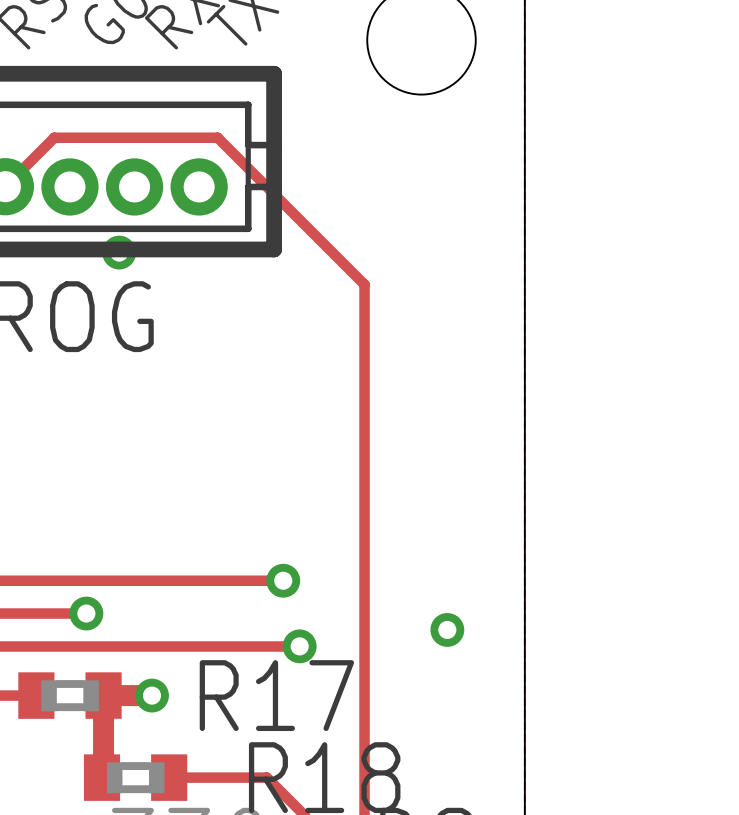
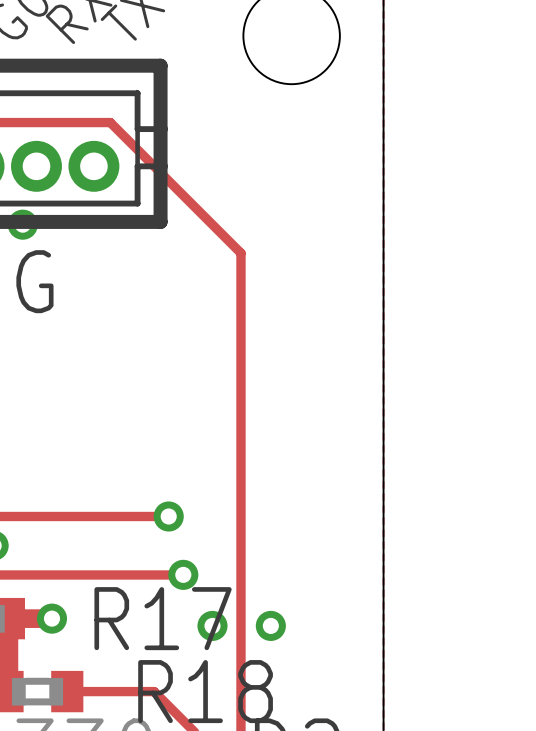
via: (447, 629) -> none
via: none -> (212, 625)
via: none -> (270, 625)

